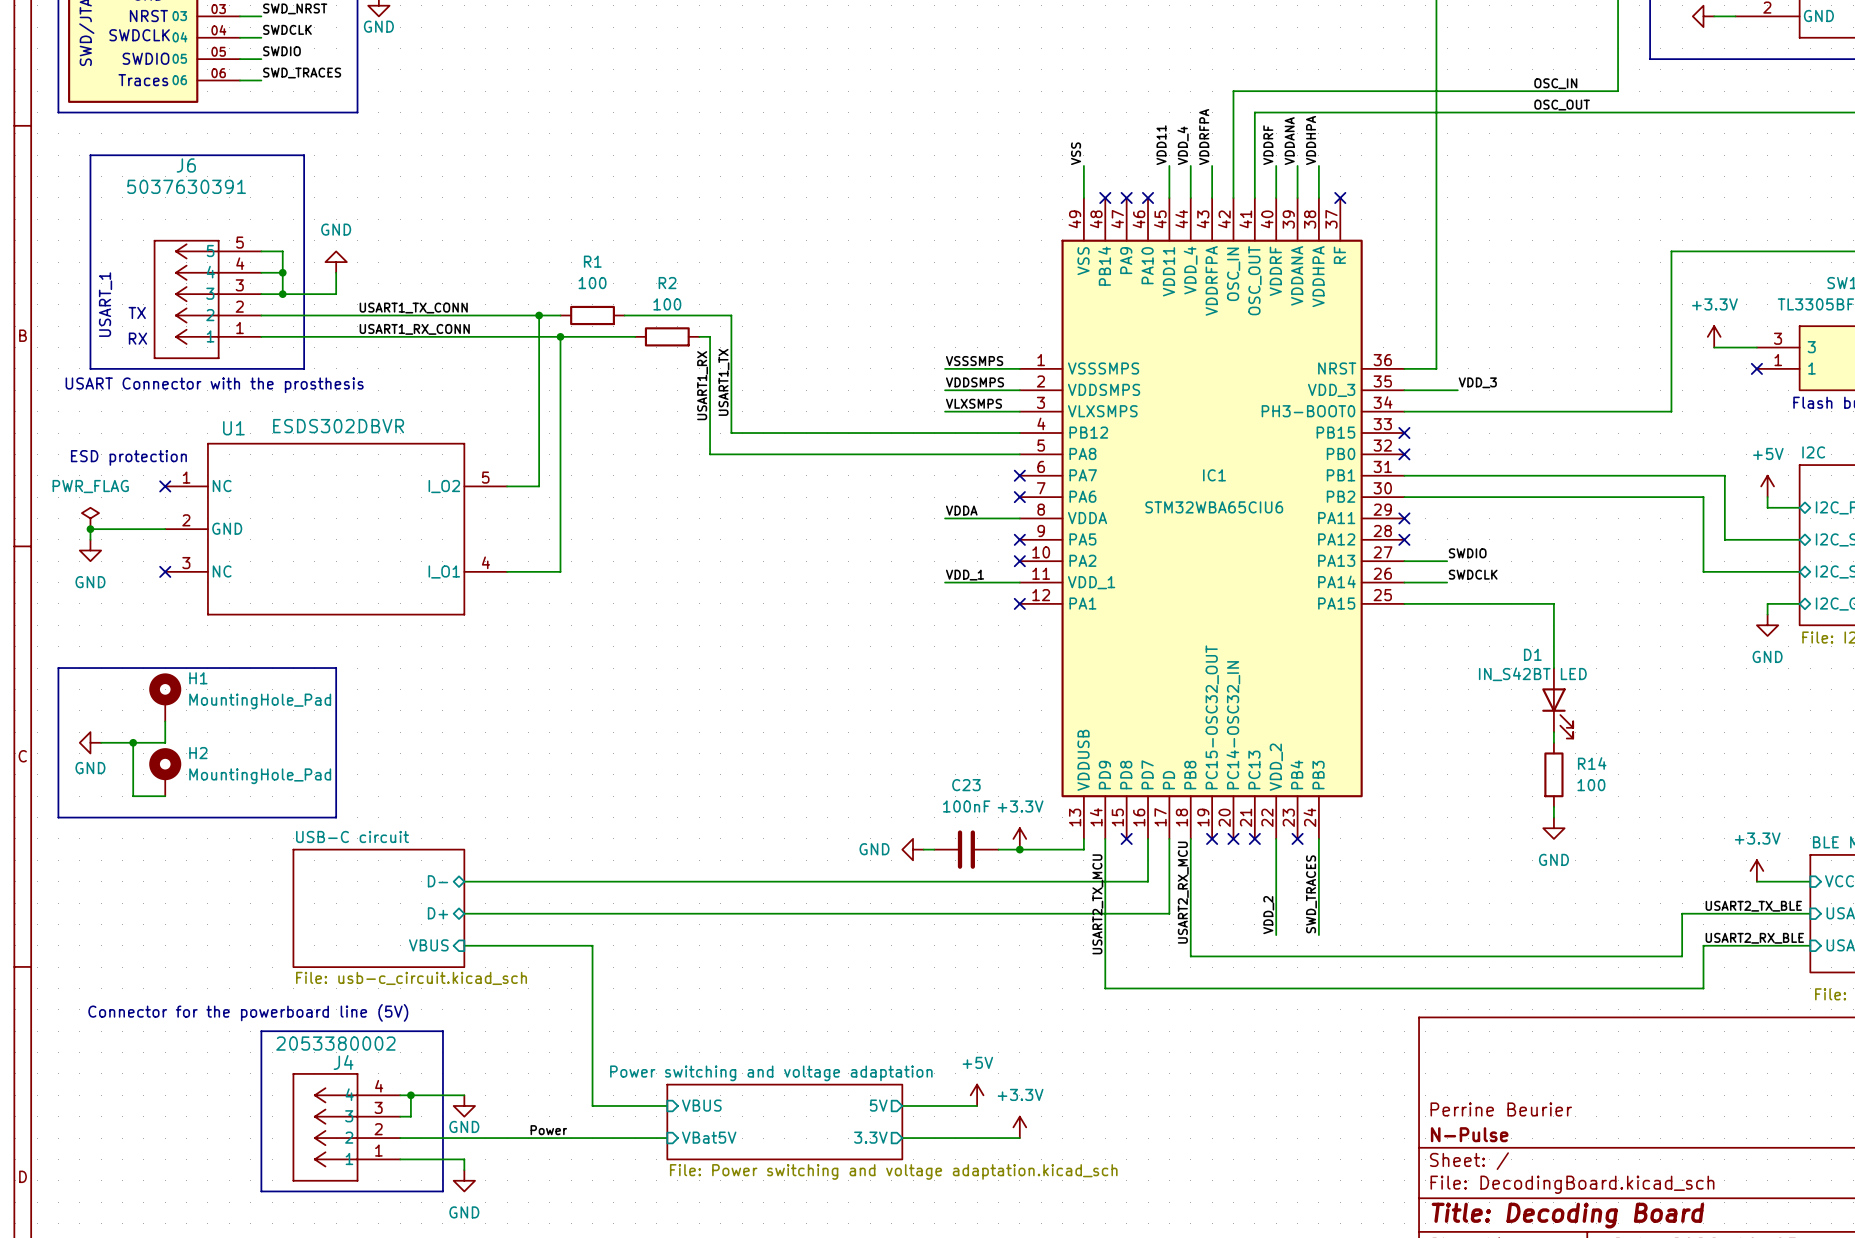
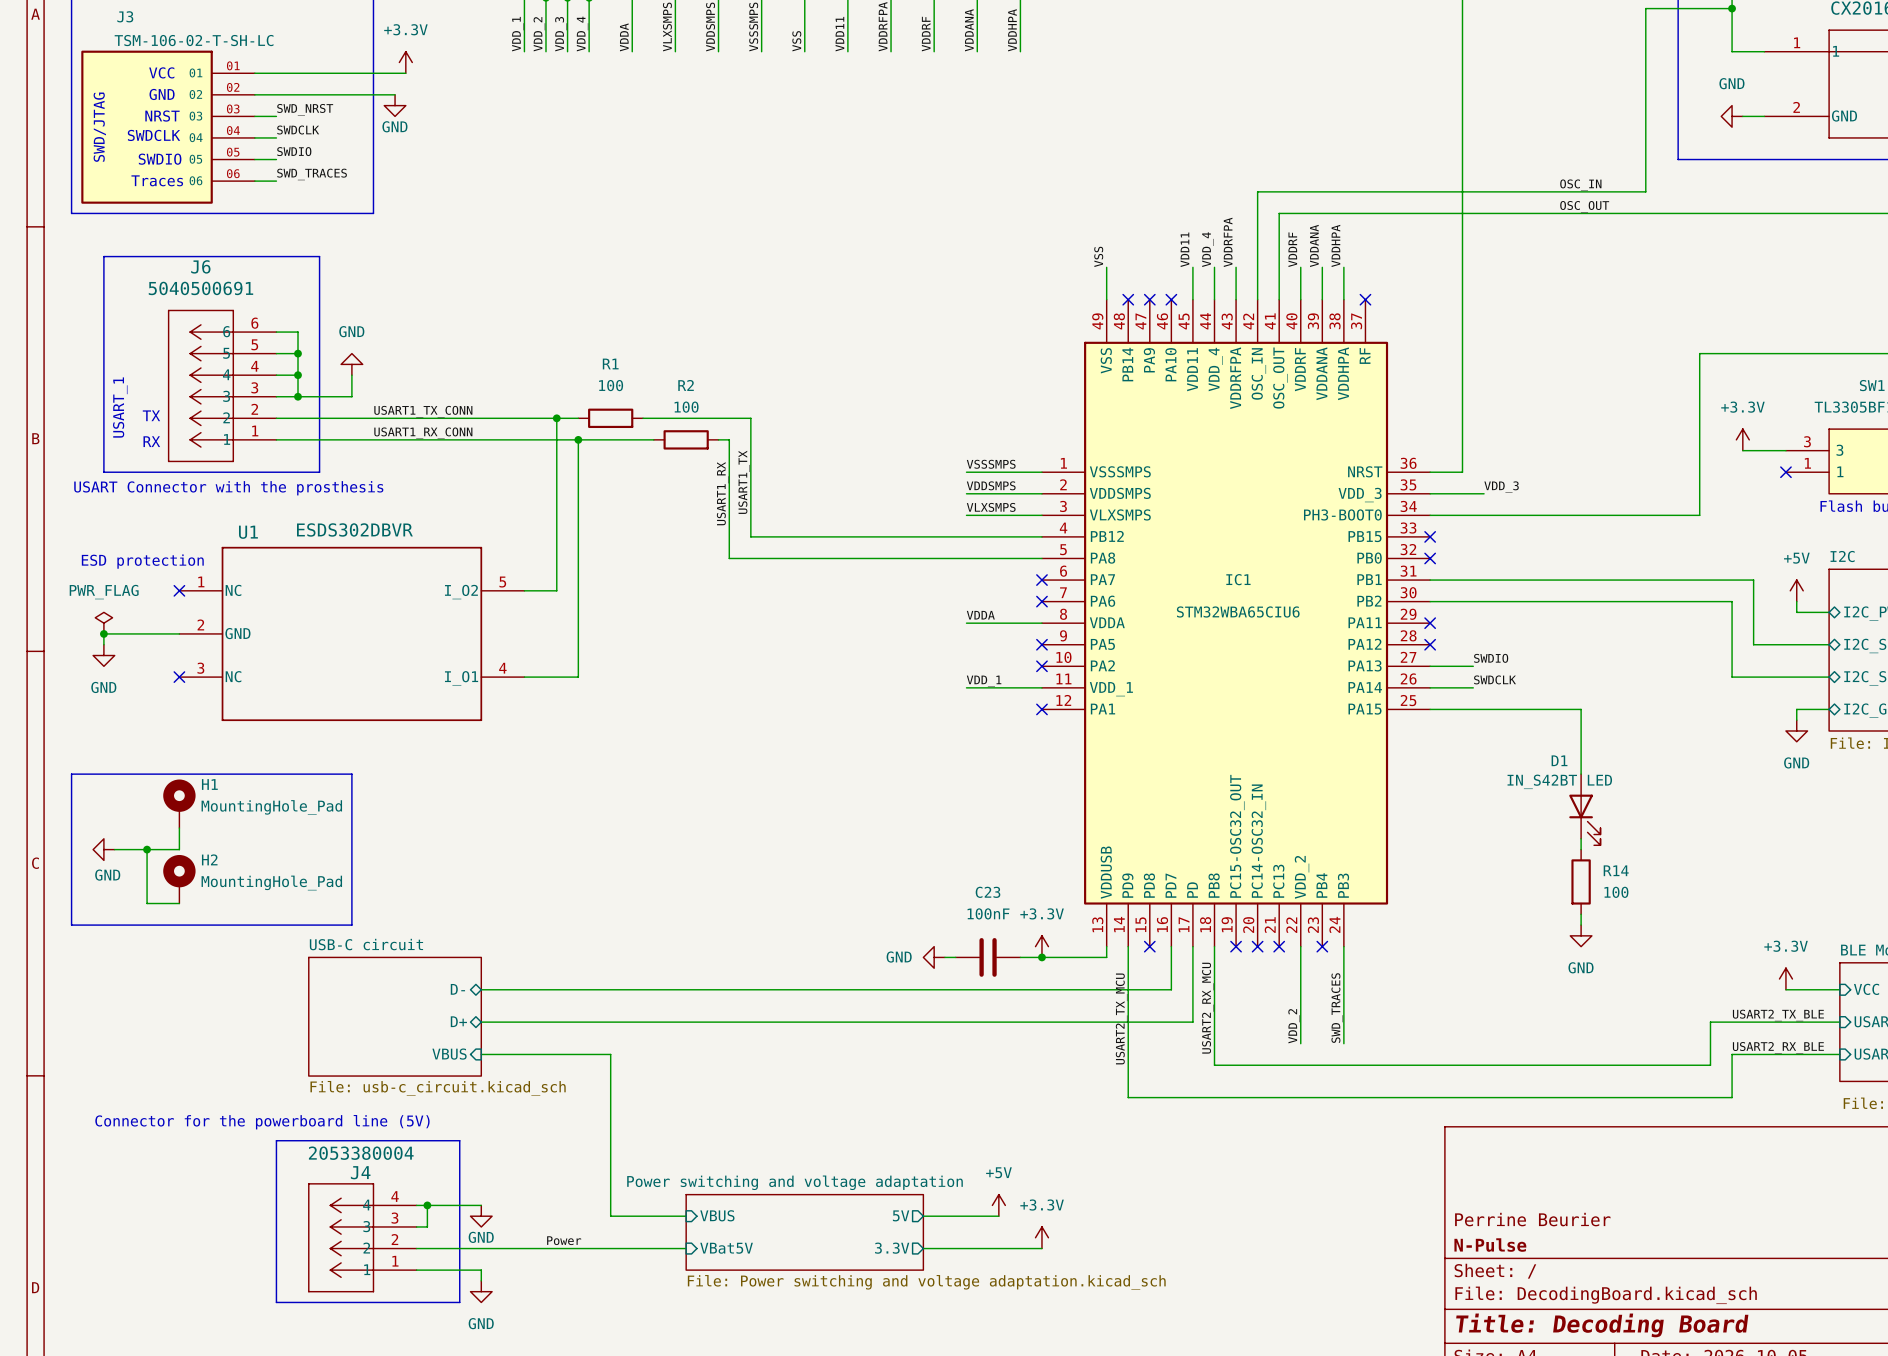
J6 value: 5037630391 (186, 186) -> 5040500691 (200, 288)
wire: none -> (276, 332) (298, 332) (298, 353)
J6 symbol: [154, 240, 262, 359] -> [168, 309, 277, 462]
junction: none -> (298, 353)
J4 value: 2053380002 (335, 1043) -> 2053380004 (361, 1153)

